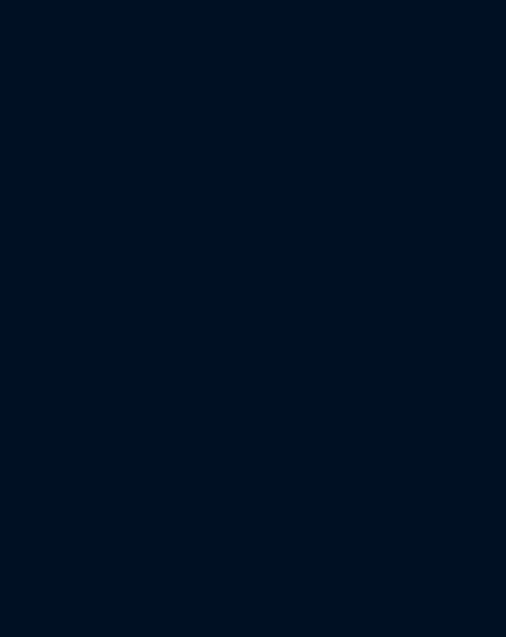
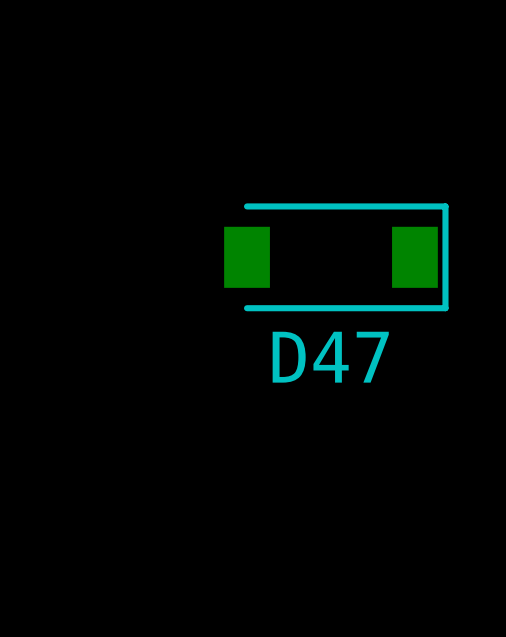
D47: none -> (336, 257)

